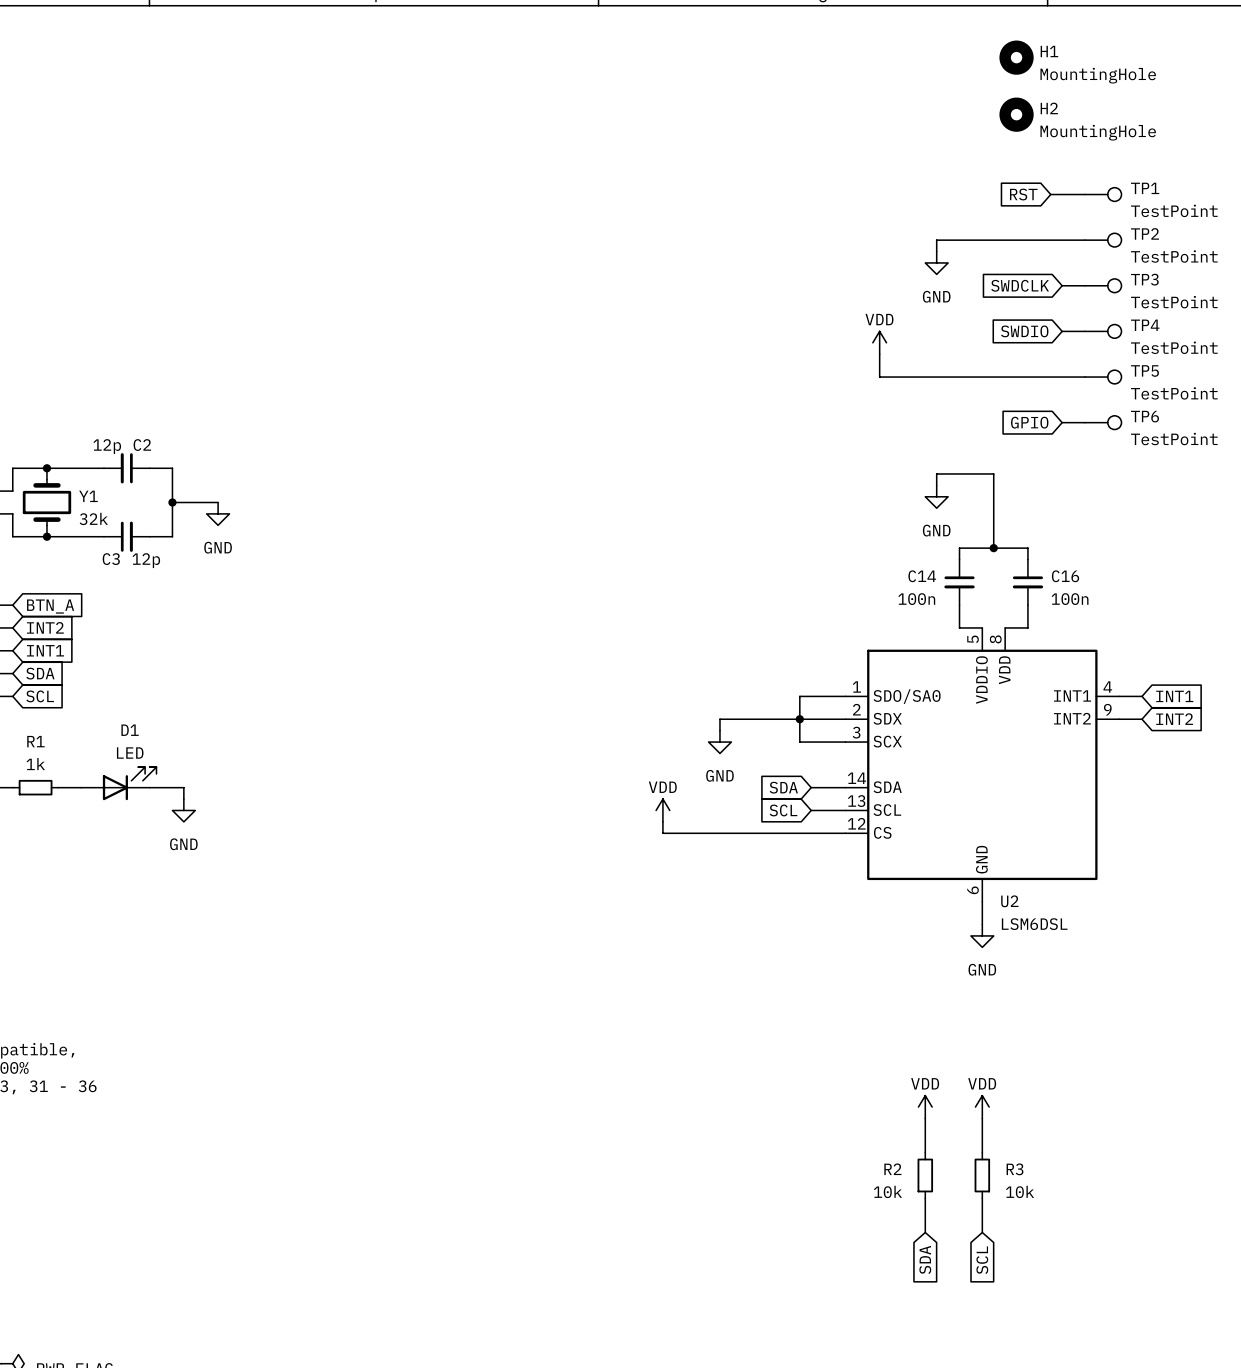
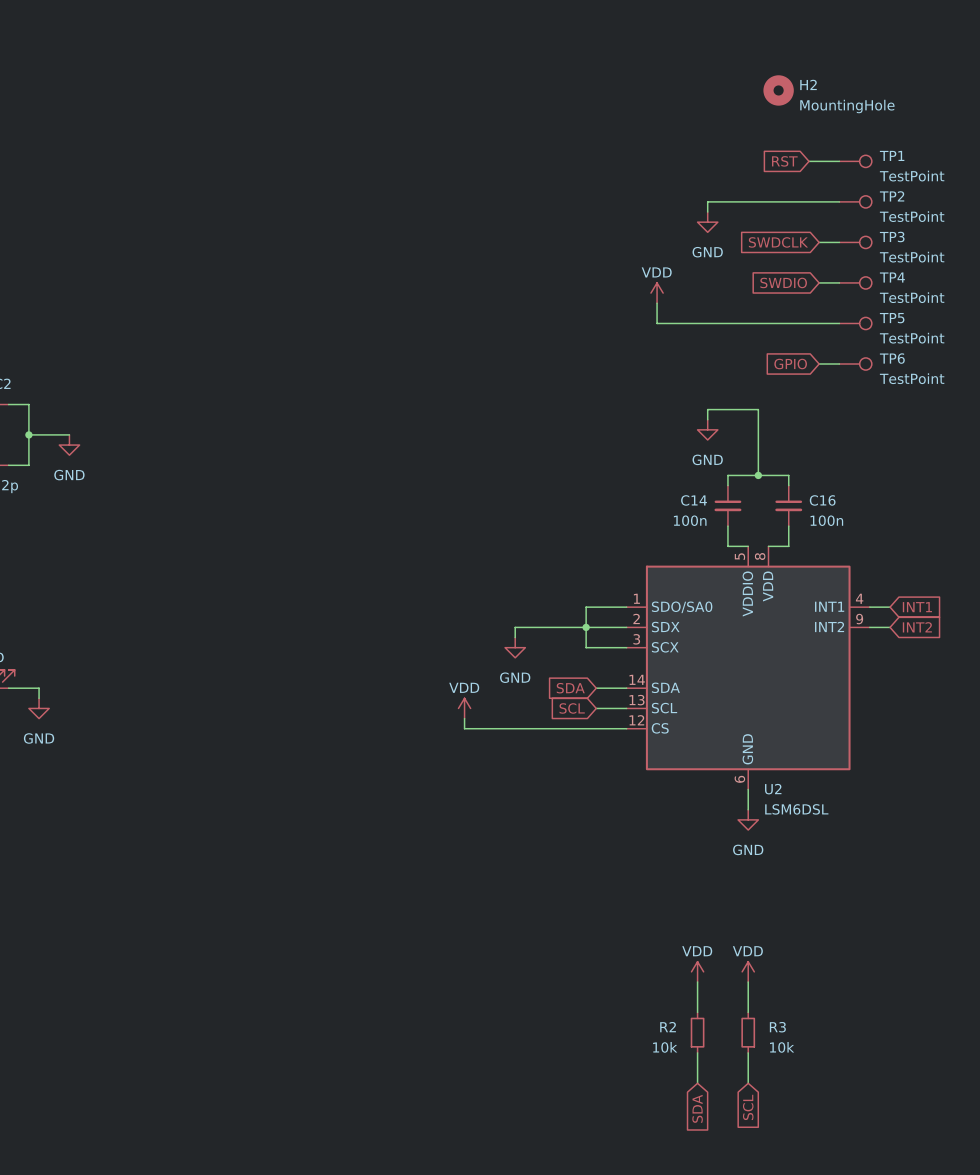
H1: MountingHole (1016, 57) -> none

